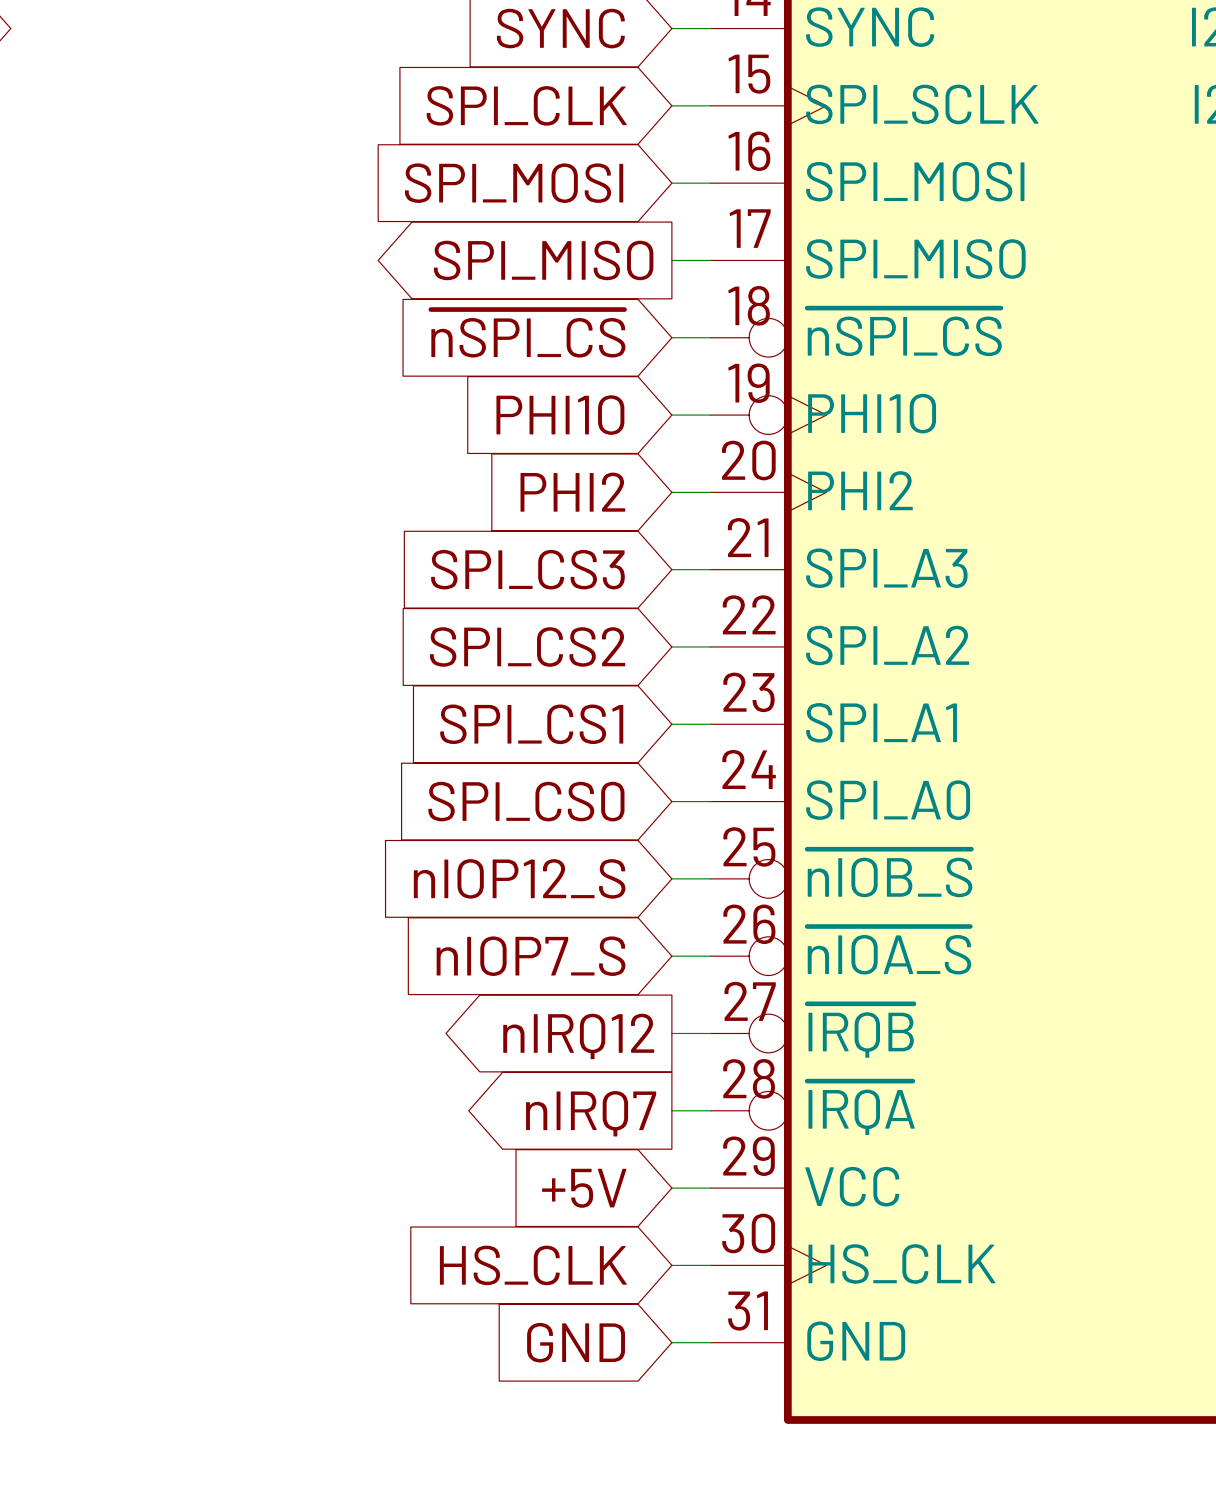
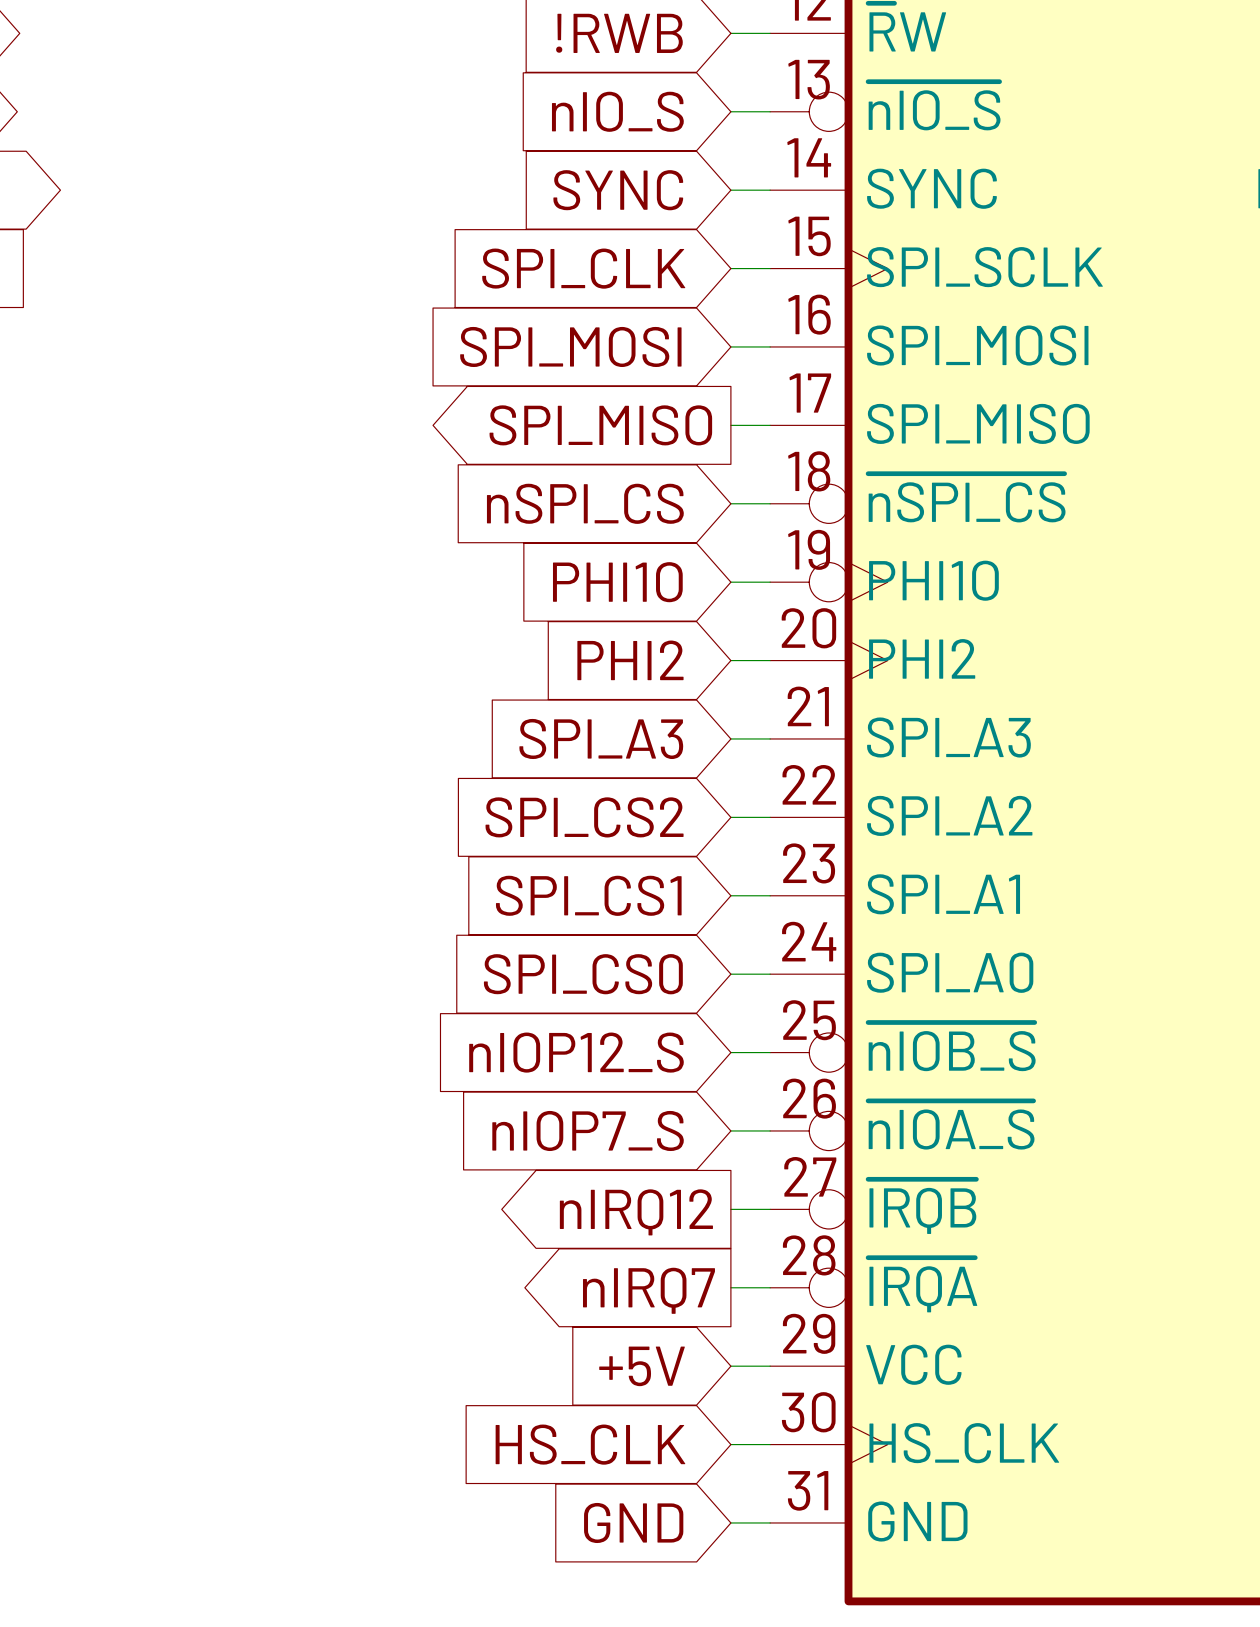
global label: ~{nSPI_CS} (528, 333) -> nSPI_CS (585, 503)
global label: SPI_CS3 (527, 569) -> SPI_A3 (601, 738)

